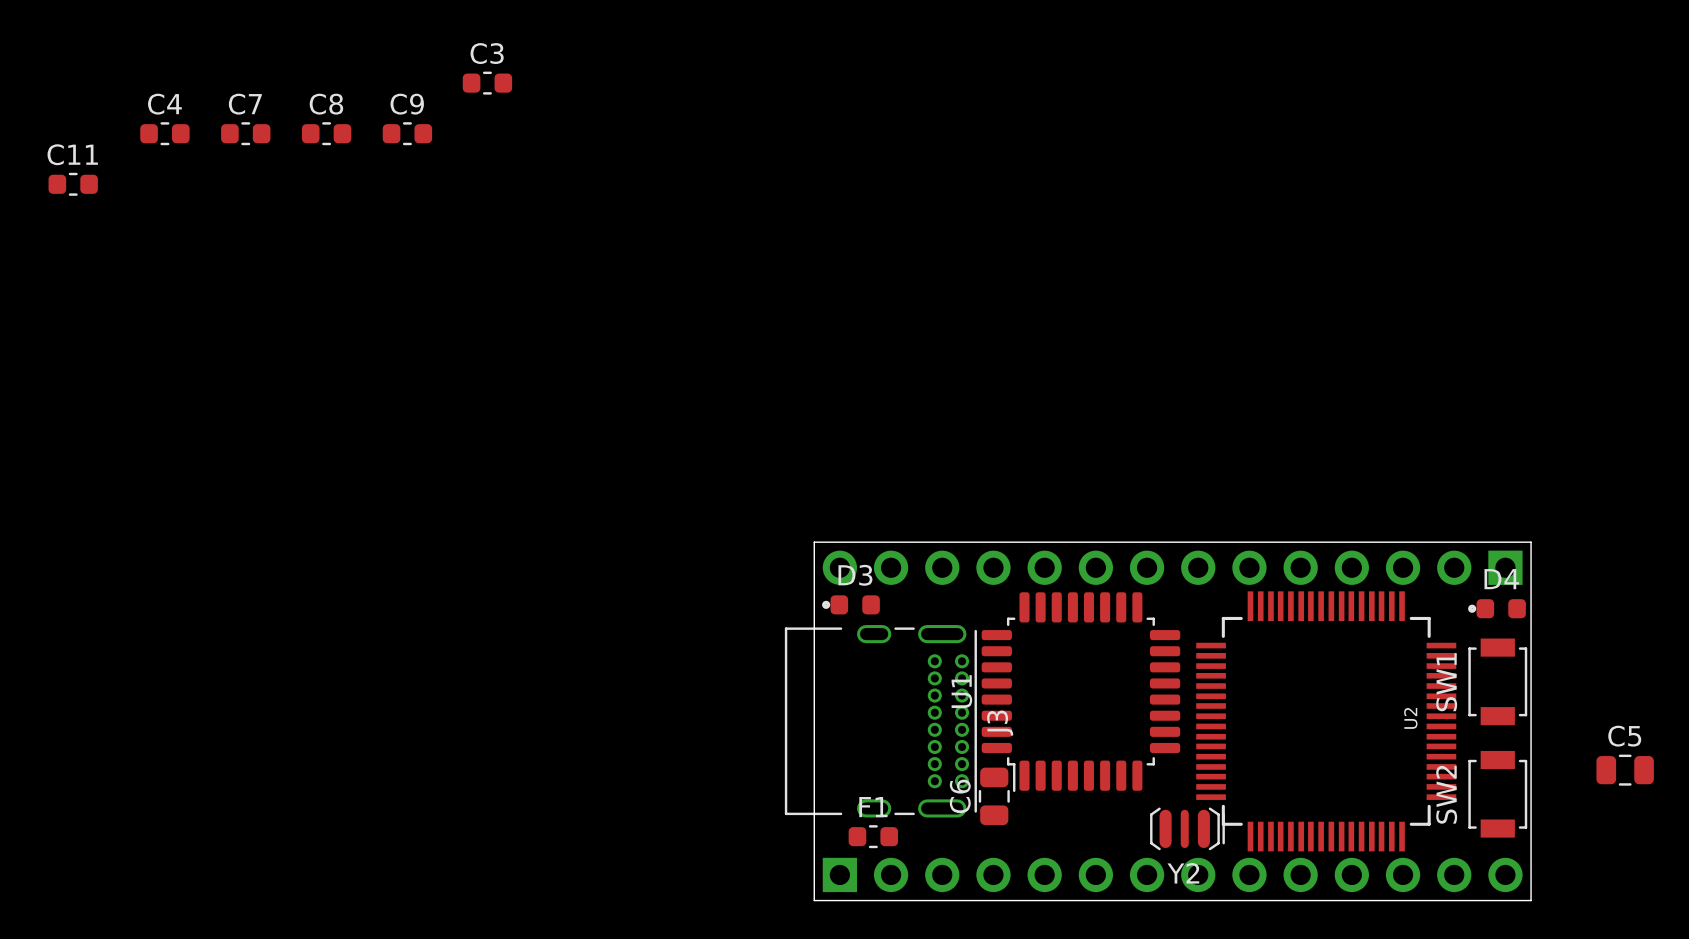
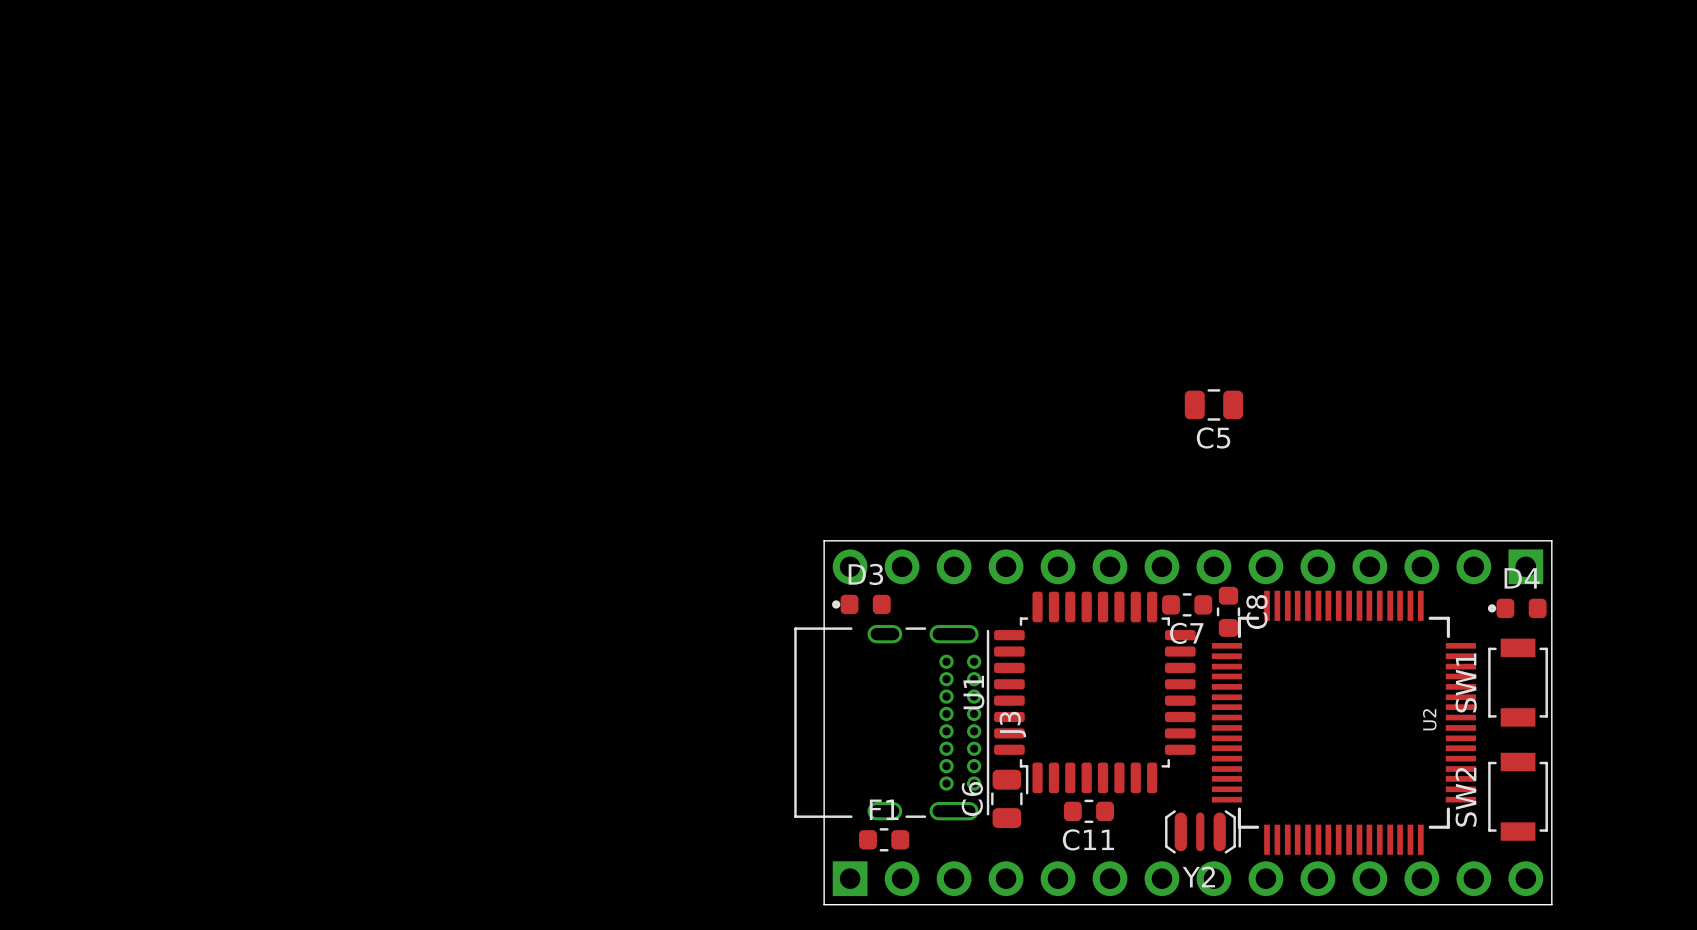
C3: (487, 83) -> none
C7 name position: C7 (245, 104) -> C7 (1186, 633)
C4: (164, 133) -> none
C7 position: (245, 133) -> (1187, 604)
C8 rotation: 0° (326, 133) -> 90° clockwise (1228, 611)
C8 position: (326, 133) -> (1228, 611)
C9: (407, 133) -> none
C11 name position: C11 (72, 154) -> C11 (1088, 839)
C11 position: (73, 184) -> (1088, 811)
C5 name position: C5 (1624, 736) -> C5 (1213, 437)
C5 position: (1625, 770) -> (1213, 404)

